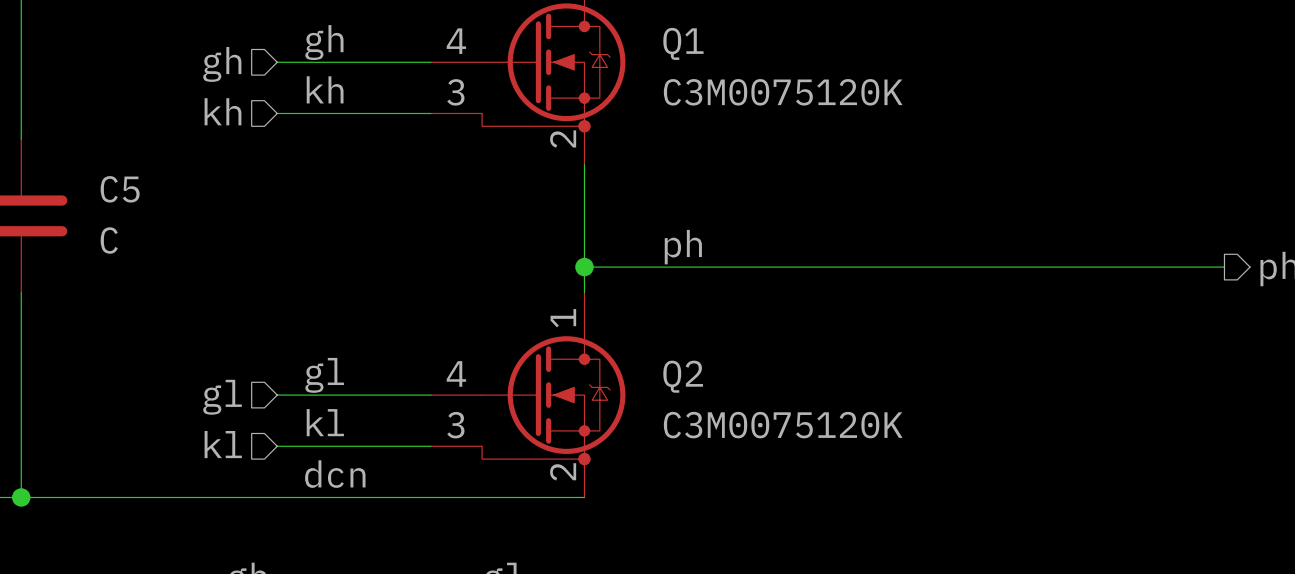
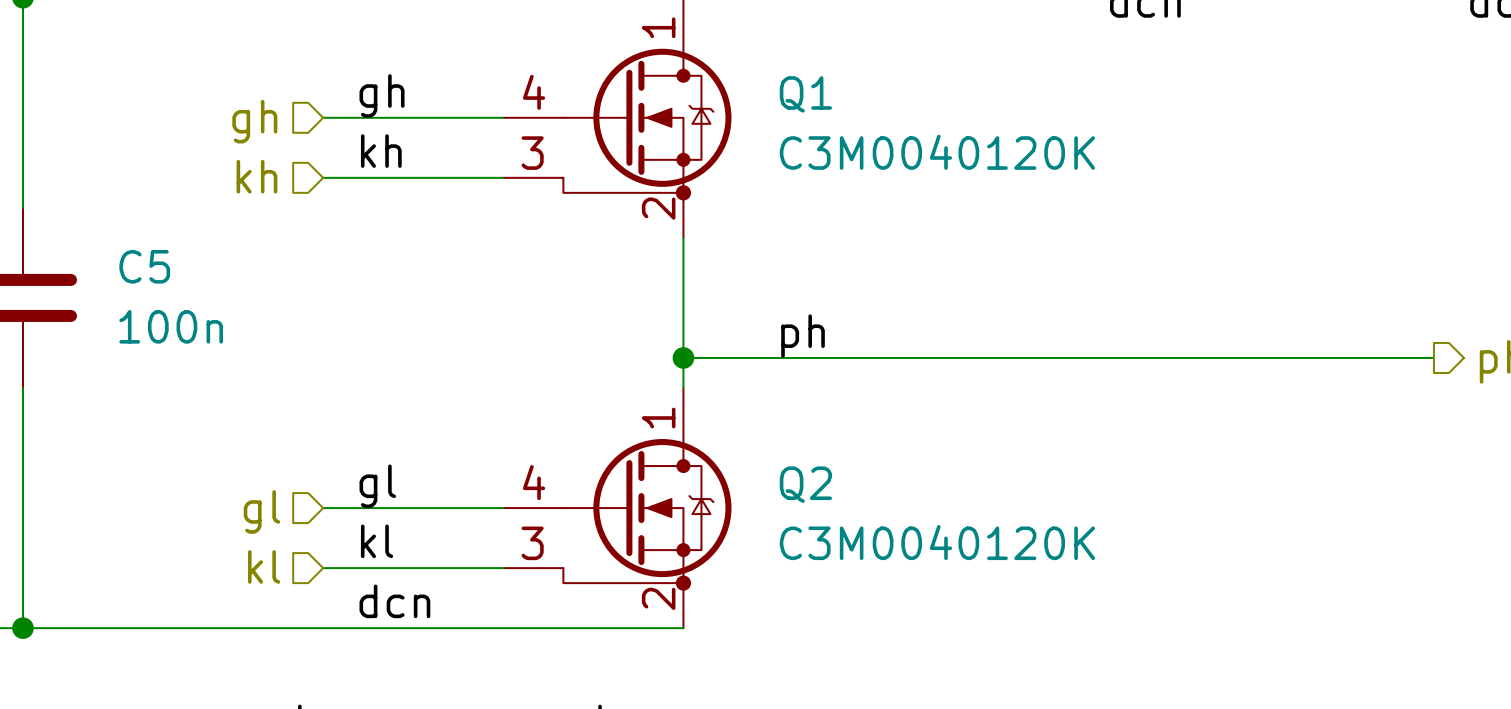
Q1 value: C3M0075120K (783, 92) -> C3M0040120K (937, 152)
C5 value: C (109, 240) -> 100n (171, 326)
Q2 value: C3M0075120K (783, 425) -> C3M0040120K (937, 542)

